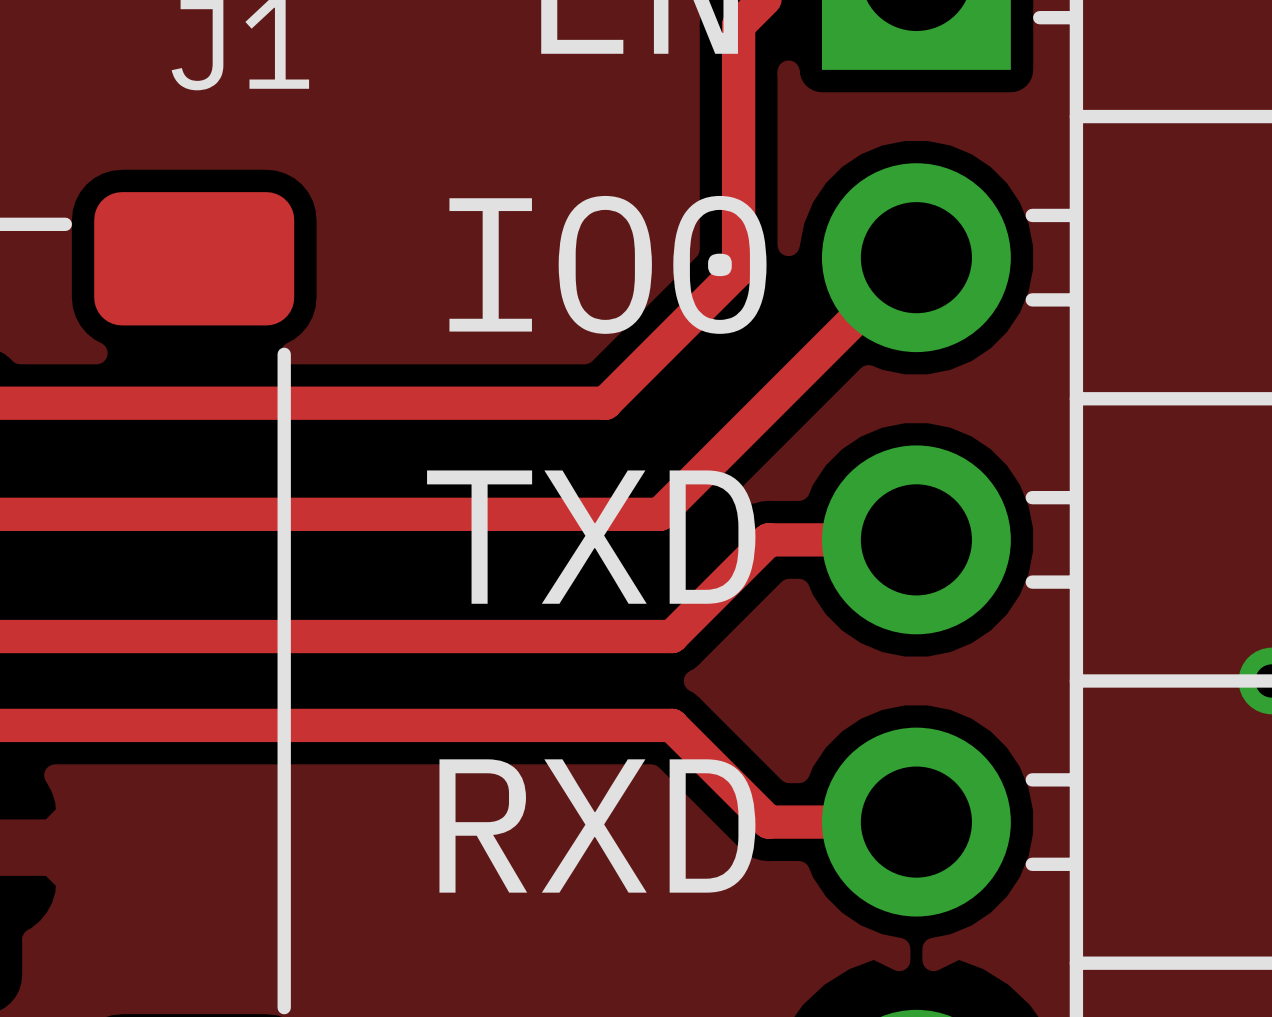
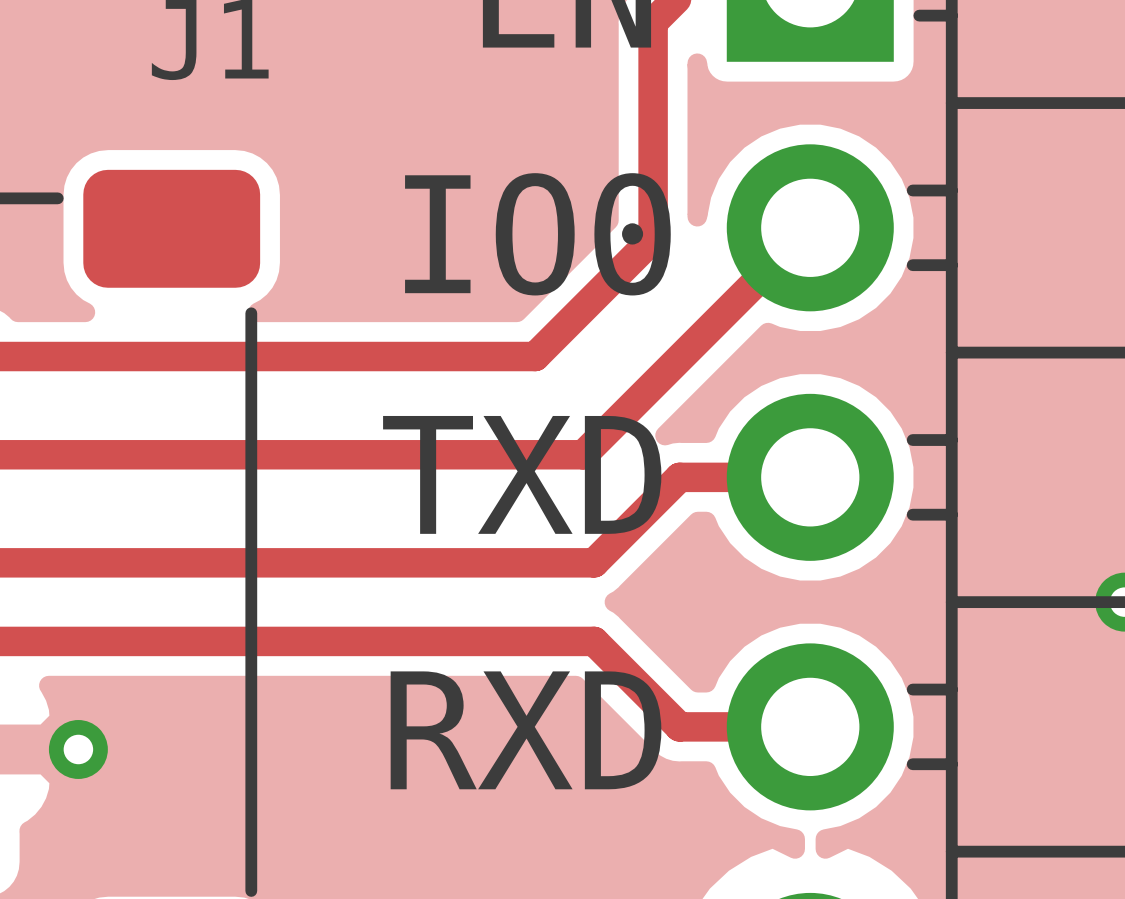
via: none -> (78, 749)

